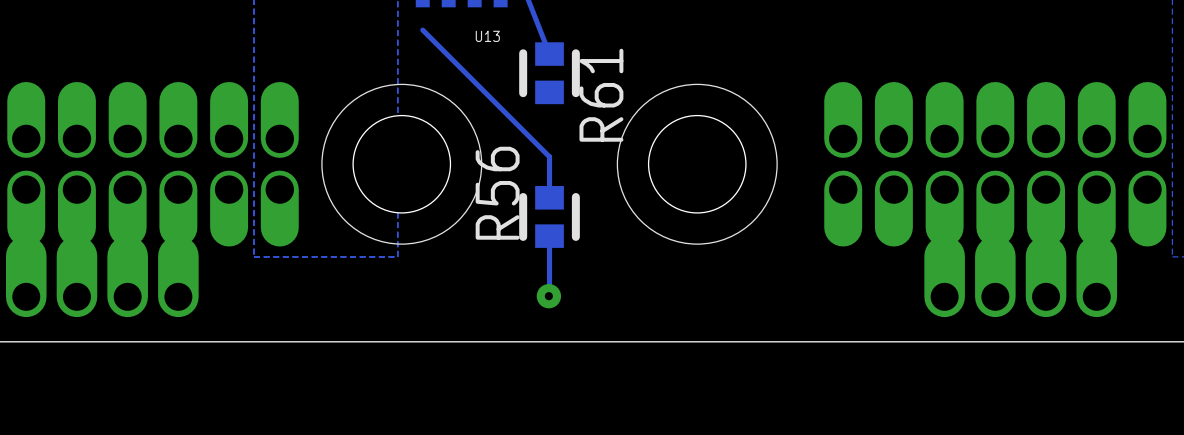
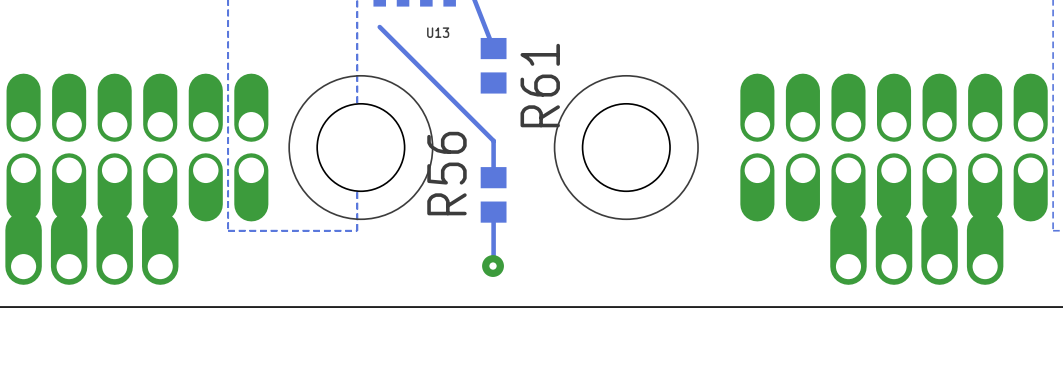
R61 footprint: [519, 42, 580, 105] -> [480, 37, 507, 94]
R56 footprint: [519, 186, 580, 248] -> [480, 167, 507, 223]

